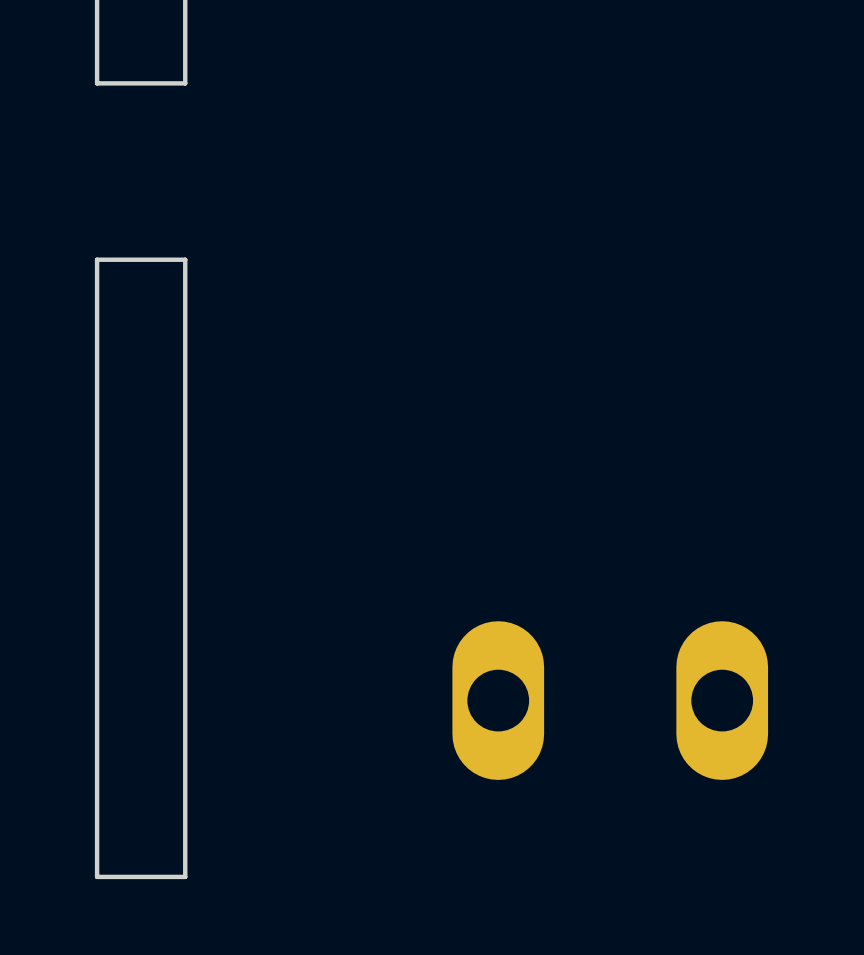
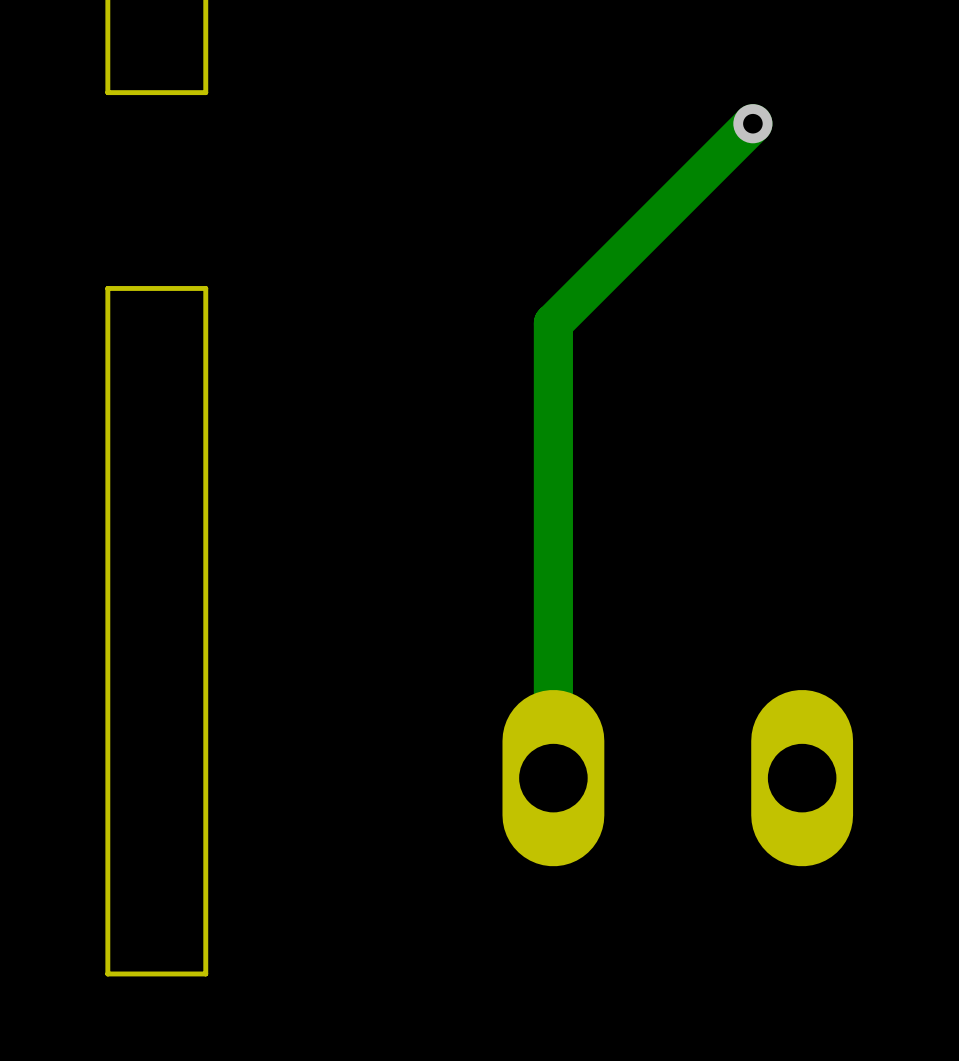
track: none -> (752, 123) (553, 323) (553, 778)
via: none -> (752, 123)

